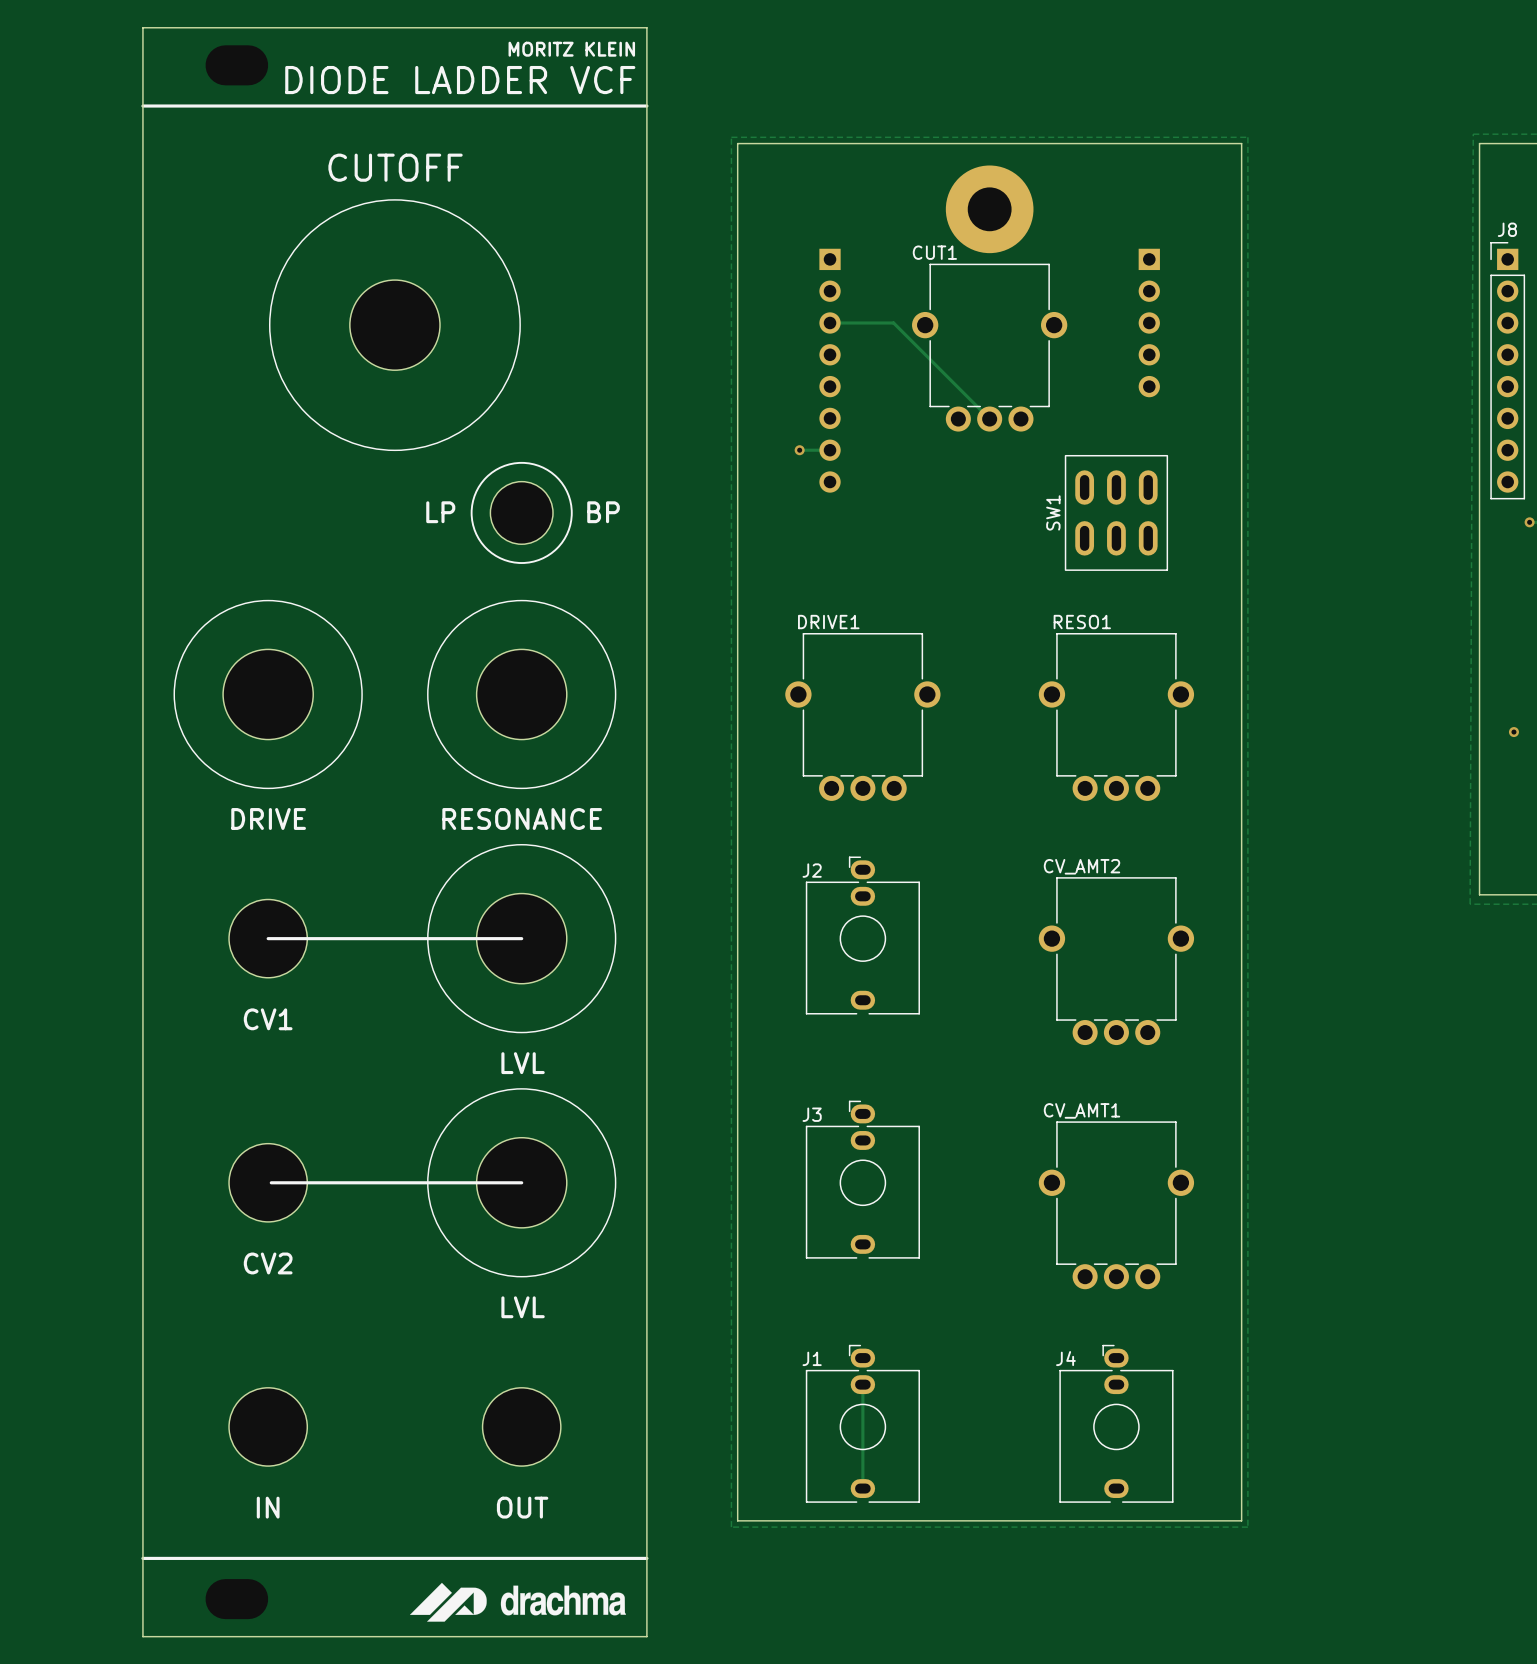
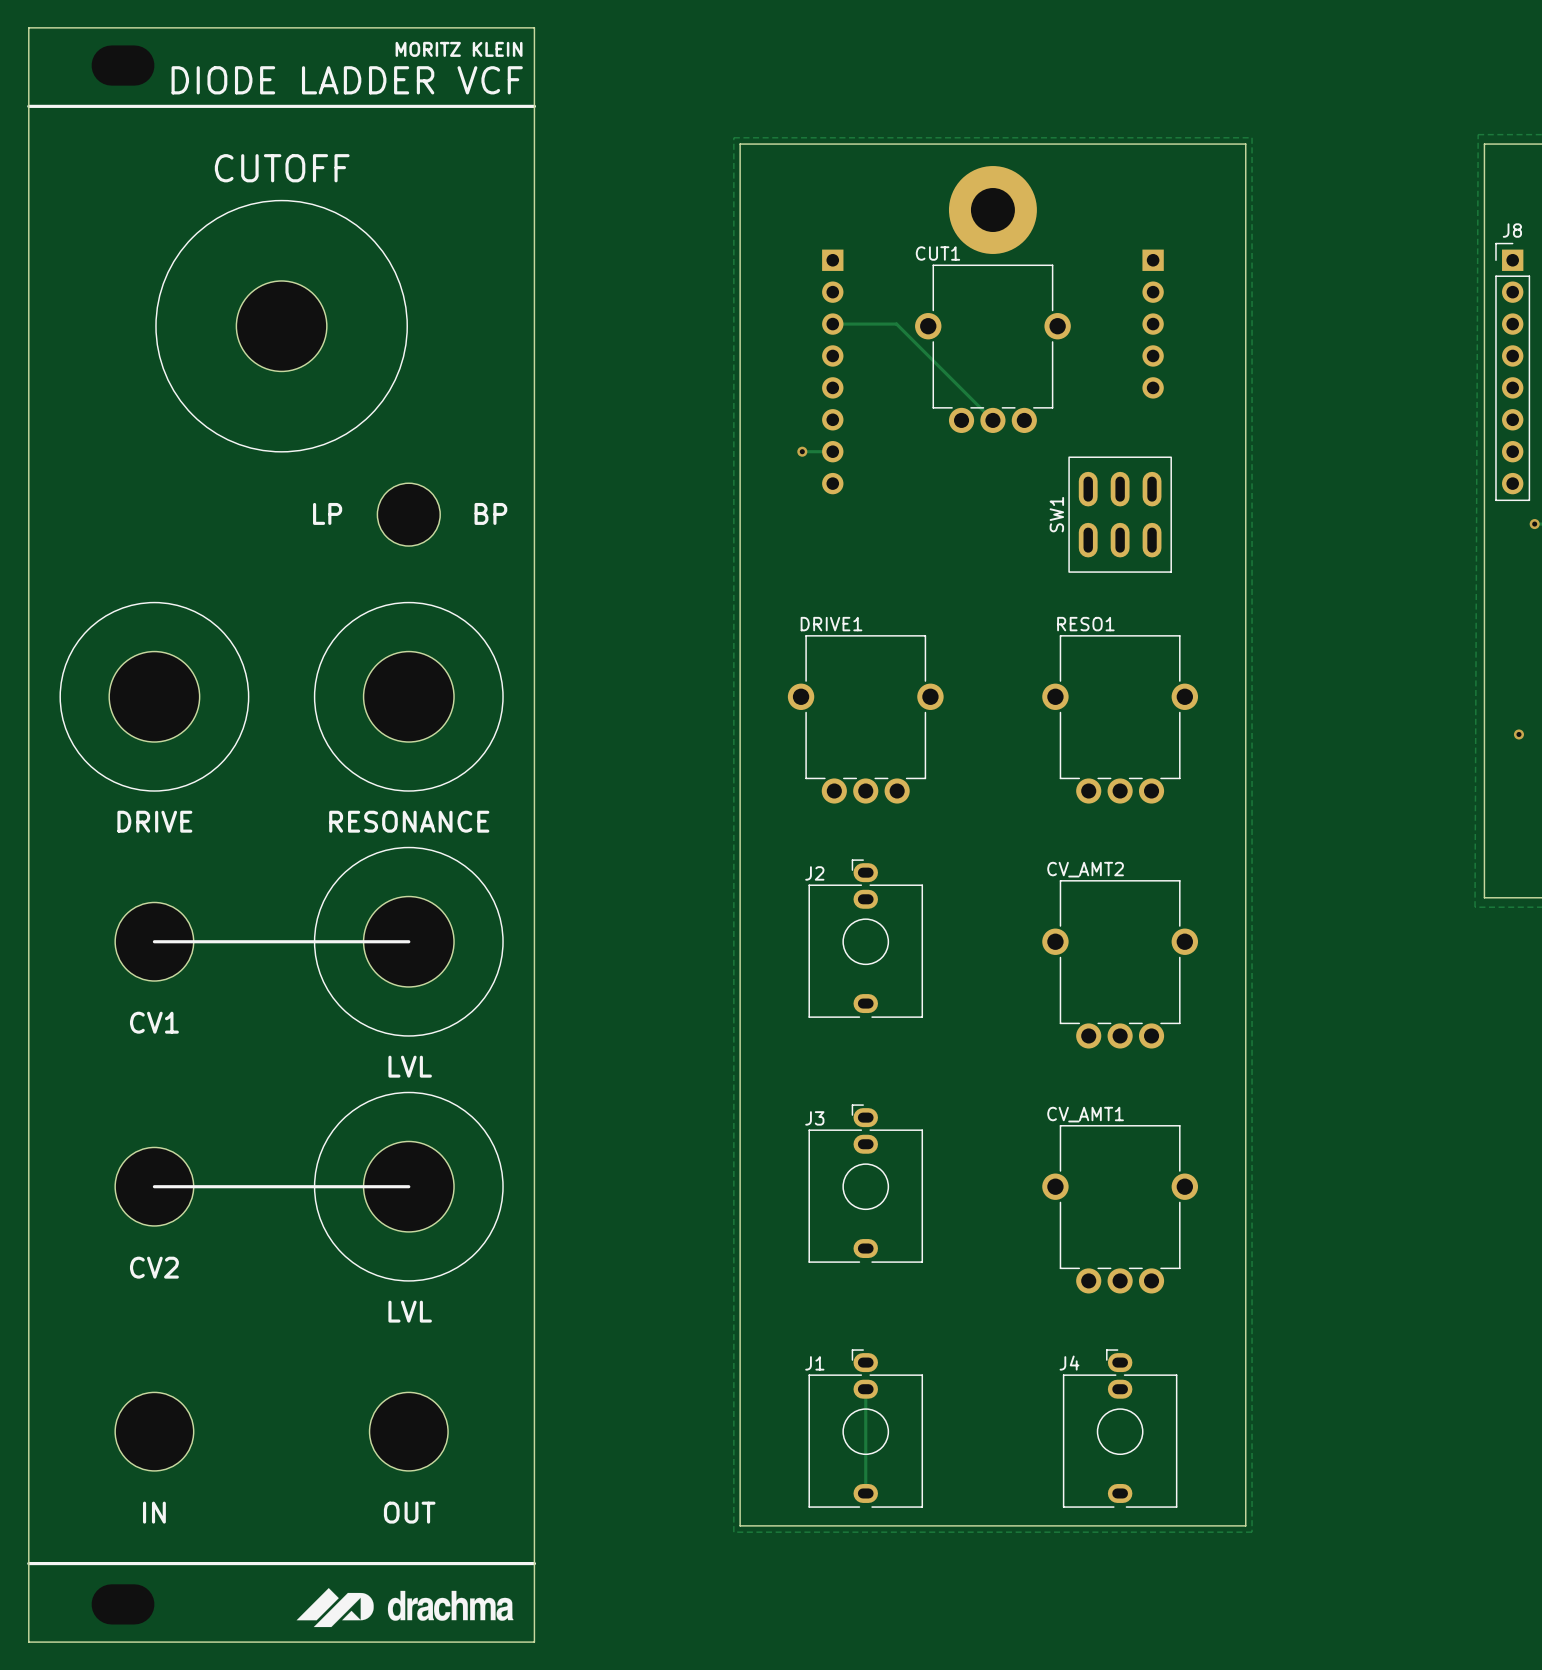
board edge: (142, 27) (142, 1636) -> (143, 27) (28, 27) (28, 1642) (143, 1642)
board edge: (532, 27) (646, 27) (646, 1636) (532, 1636) -> (534, 27) (534, 1642)
text position: MORITZ KLEIN (571, 49) -> MORITZ KLEIN (459, 49)
part position: (236, 65) -> (123, 65)
text position: DIODE LADDER VCF (460, 80) -> DIODE LADDER VCF (347, 80)
line: none -> (28, 106) (143, 106)
line: (532, 106) (646, 106) -> none
text position: CUTOFF (395, 167) -> CUTOFF (282, 168)
part position: (394, 325) -> (281, 326)
drawing position: (394, 325) -> (281, 326)
drawing: [470, 461, 573, 564] -> none
text position: LP (440, 512) -> LP (327, 513)
part position: (521, 512) -> (408, 514)
text position: BP (603, 512) -> BP (490, 513)
drawing: none -> [59, 601, 250, 792]
drawing: [173, 599, 363, 790] -> none
drawing: none -> [313, 601, 504, 792]
drawing: [427, 599, 617, 790] -> none
part: none -> (154, 696)
part: (268, 694) -> none
part: none -> (408, 696)
part: (521, 694) -> none
text position: DRIVE (268, 818) -> DRIVE (154, 821)
text position: RESONANCE (522, 818) -> RESONANCE (409, 821)
part position: (268, 938) -> (154, 941)
line: (407, 938) (521, 938) -> (154, 941) (269, 941)
part position: (521, 938) -> (408, 941)
drawing position: (521, 938) -> (408, 941)
text position: CV1 (268, 1019) -> CV1 (154, 1022)
text position: LVL (523, 1063) -> LVL (410, 1066)
line: none -> (154, 1186) (272, 1186)
part position: (268, 1182) -> (154, 1186)
line: (407, 1182) (521, 1182) -> none
part position: (521, 1182) -> (408, 1186)
drawing position: (521, 1182) -> (408, 1186)
text position: CV2 (268, 1263) -> CV2 (154, 1267)
text position: LVL (523, 1307) -> LVL (410, 1311)
part: none -> (154, 1431)
part: (268, 1426) -> none
part: none -> (408, 1431)
part: (521, 1426) -> none
text position: IN (268, 1507) -> IN (154, 1512)
text position: OUT (522, 1507) -> OUT (409, 1512)
line: none -> (28, 1563) (143, 1563)
line: (532, 1558) (646, 1558) -> none
part position: (236, 1599) -> (123, 1604)
drawing position: (517, 1602) -> (405, 1607)

